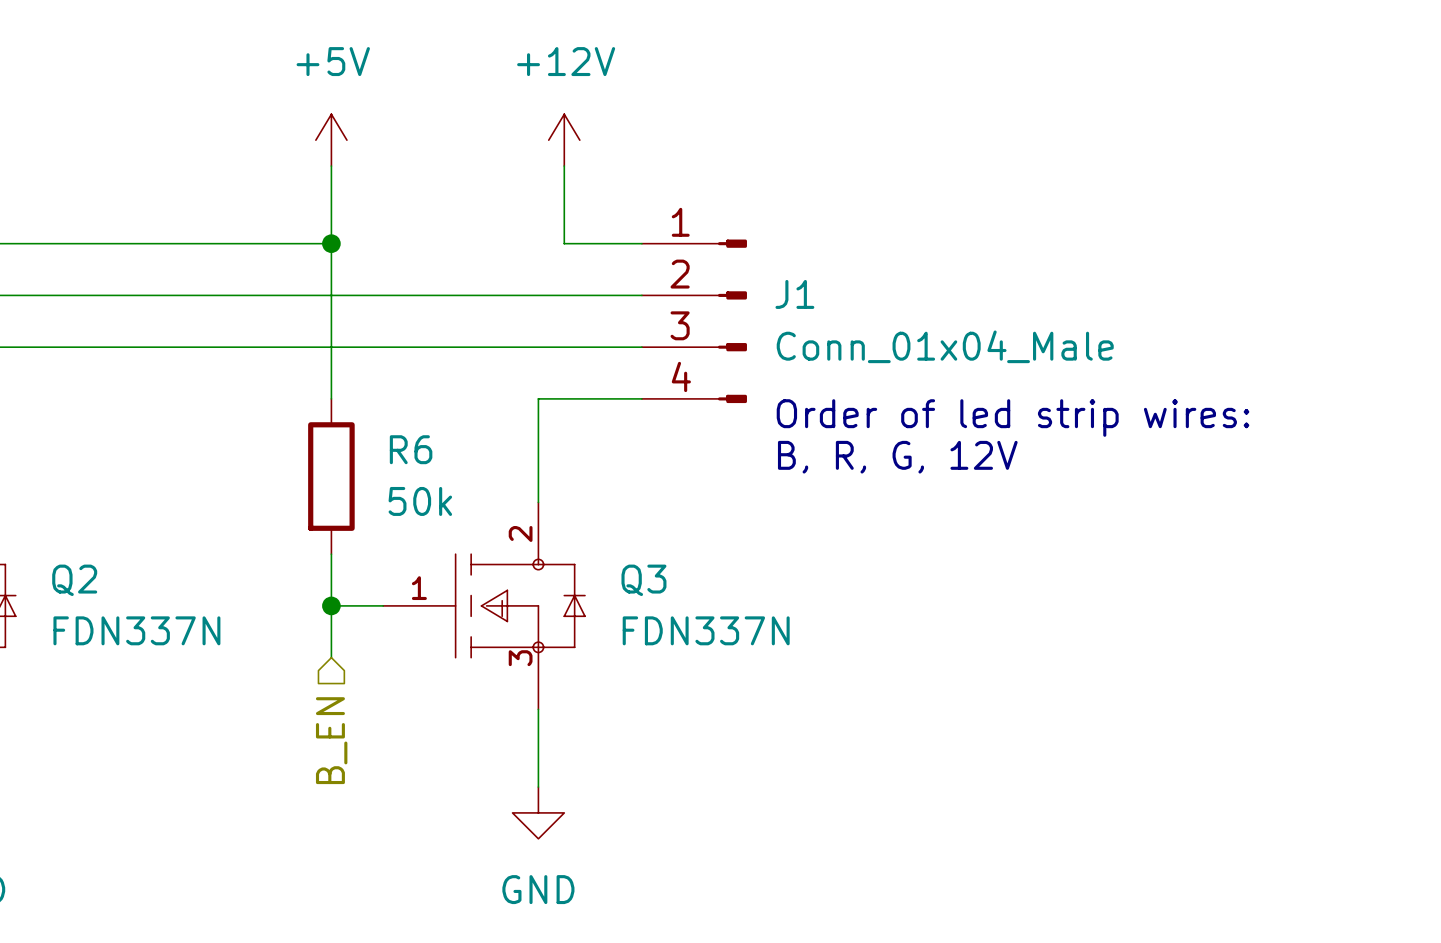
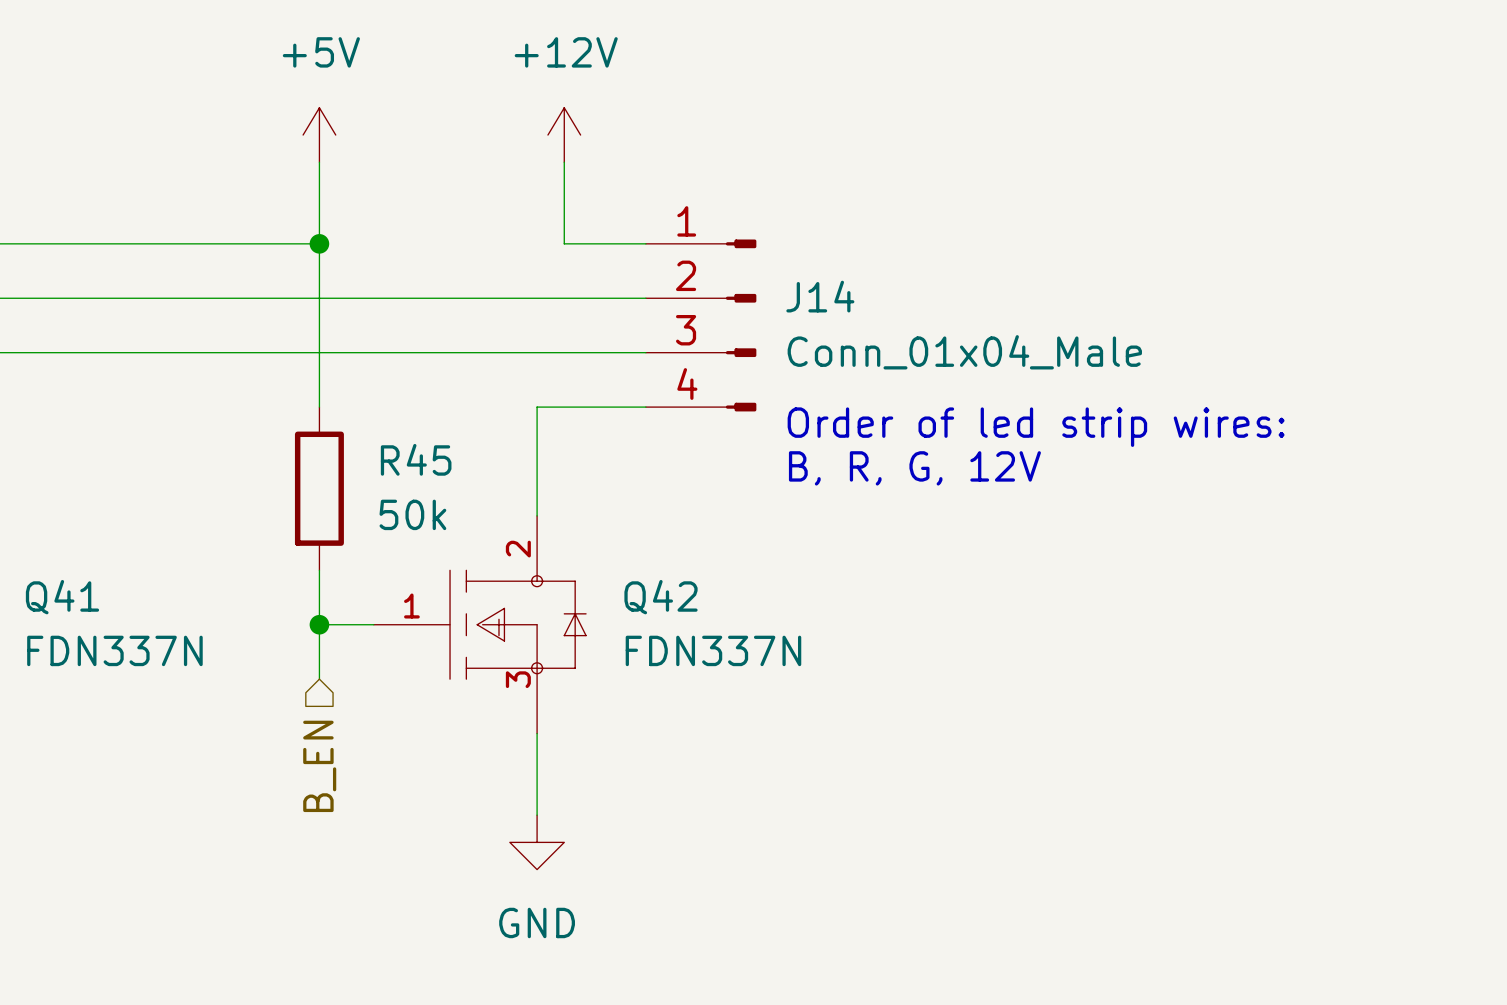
J1 name: J1 (794, 294) -> J14 (820, 296)
R6 name: R6 (411, 449) -> R45 (416, 459)
Q2 name: Q2 (74, 580) -> Q41 (62, 597)
Q3 name: Q3 (643, 580) -> Q42 (661, 597)

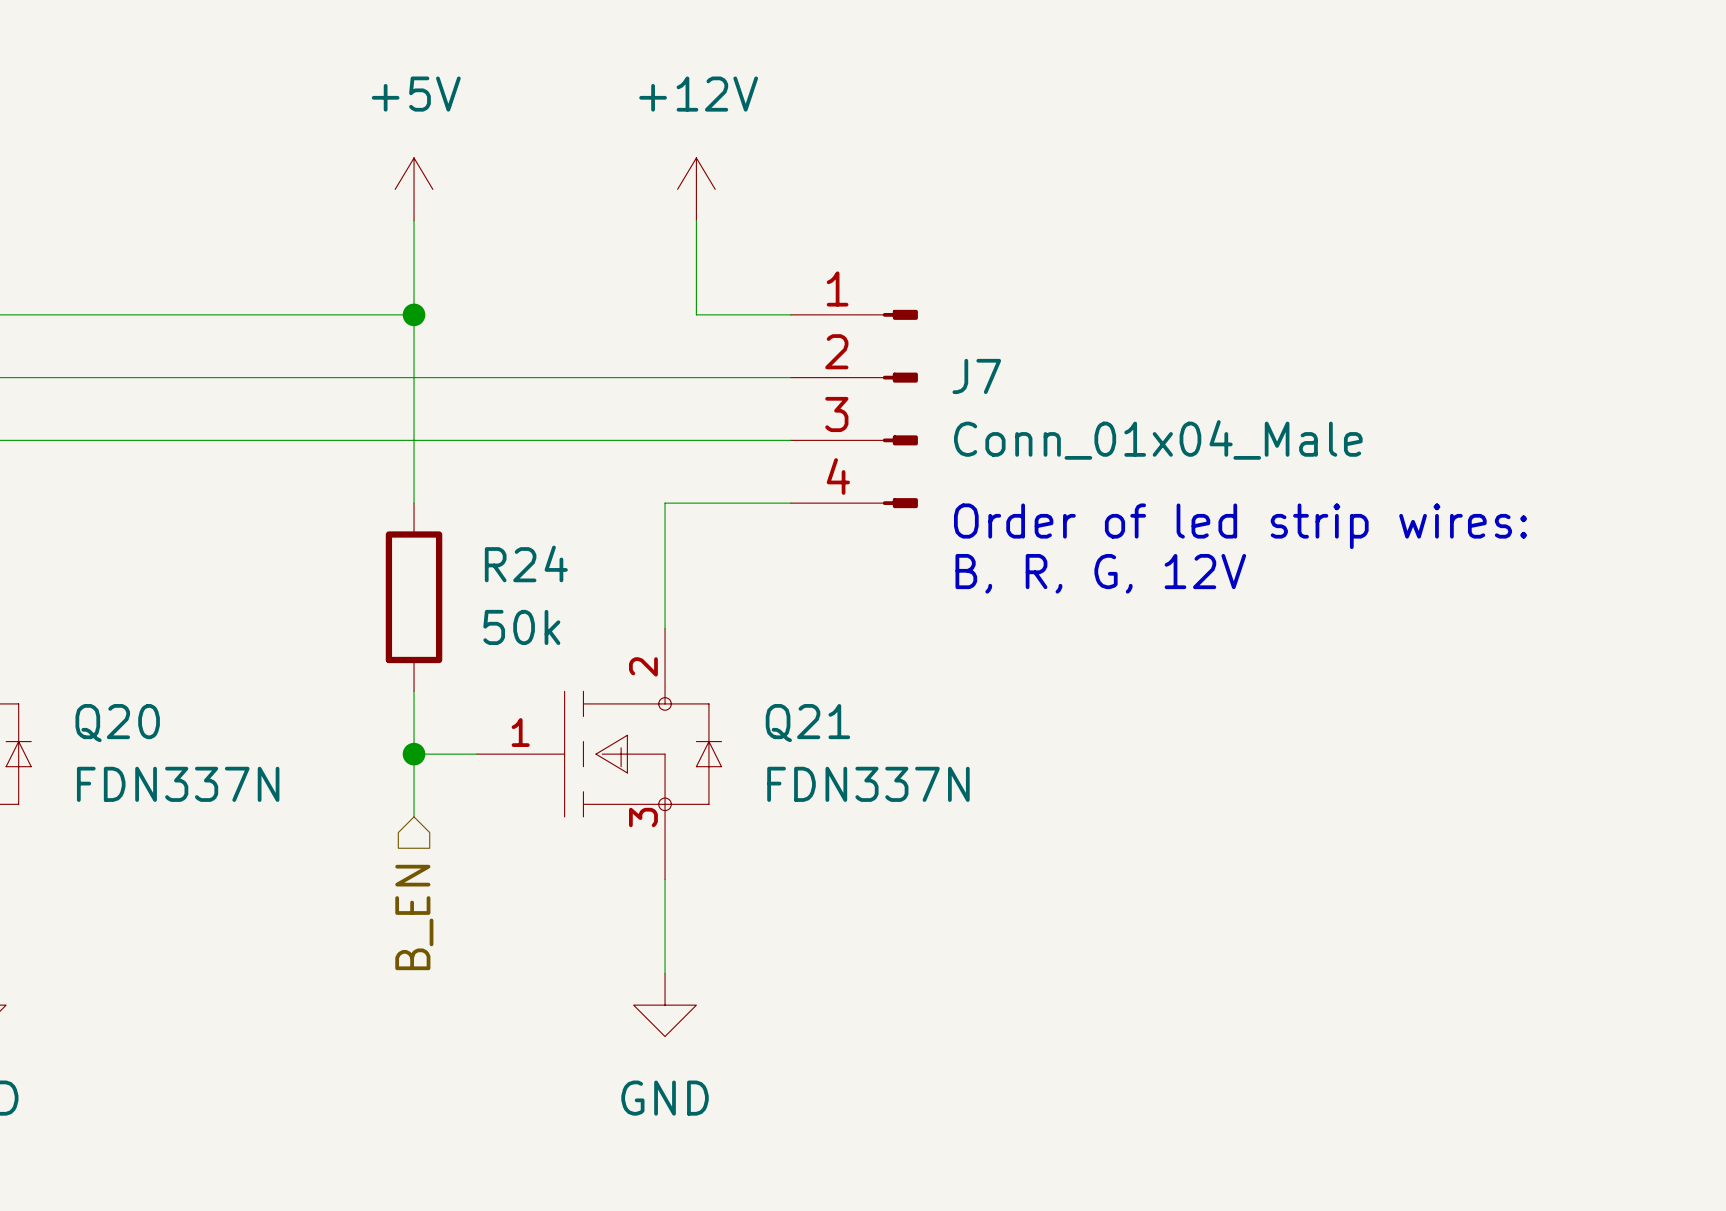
J14 name: J14 (820, 296) -> J7 (976, 376)
R45 name: R45 (416, 459) -> R24 (526, 563)
Q41 name: Q41 (62, 597) -> Q20 (117, 723)
Q42 name: Q42 (661, 597) -> Q21 (807, 723)

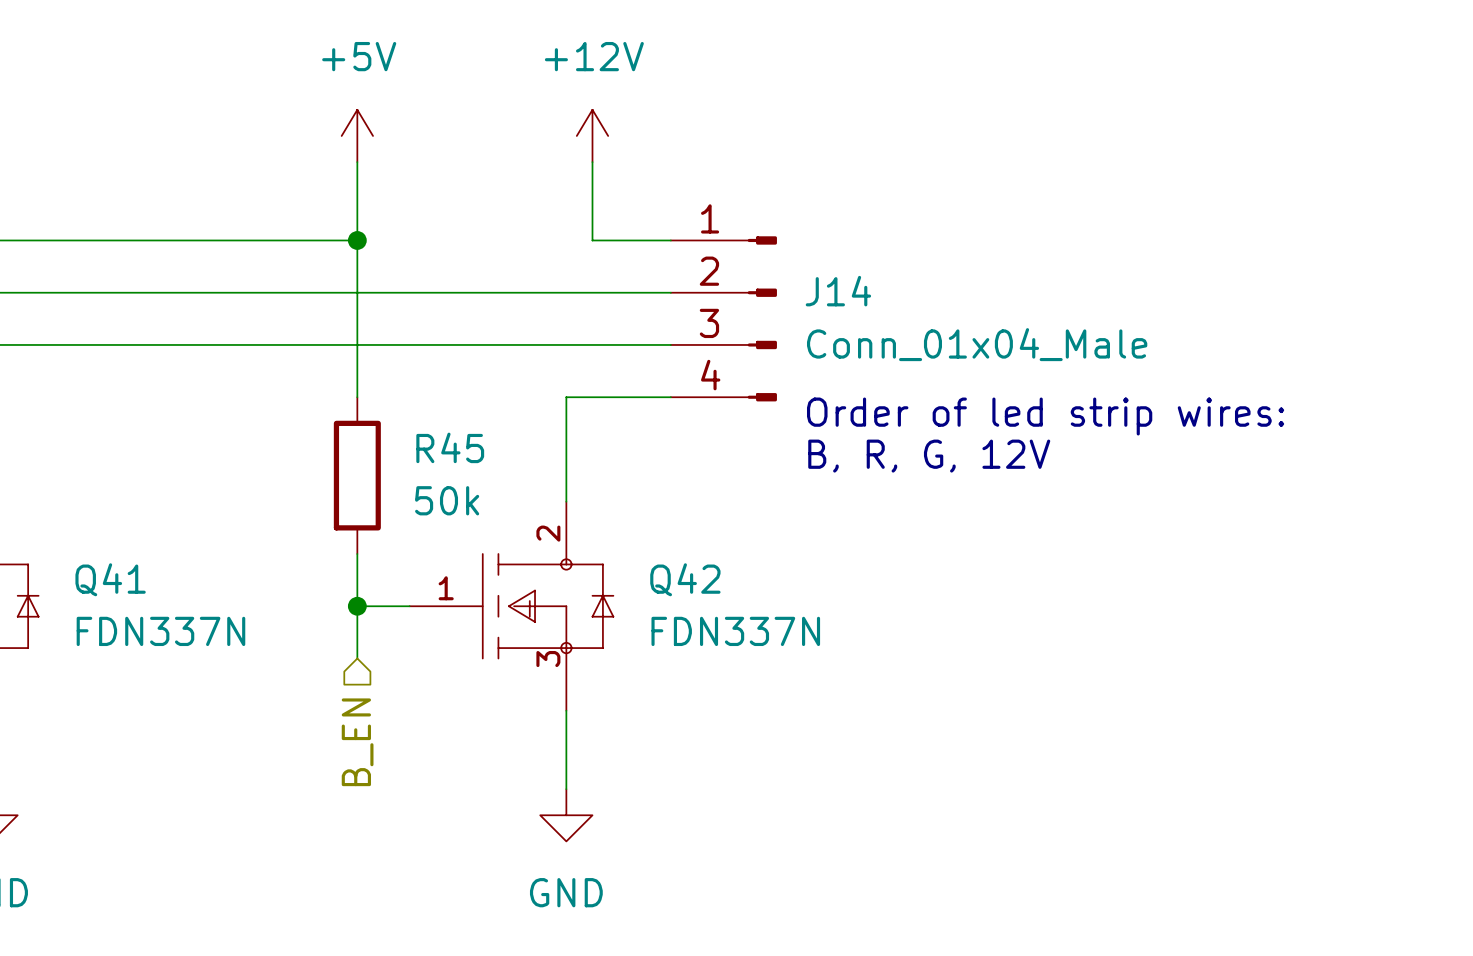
J7 name: J7 (976, 376) -> J14 (838, 291)
R24 name: R24 (526, 563) -> R45 (450, 447)
Q20 name: Q20 (117, 723) -> Q41 (110, 579)
Q21 name: Q21 (807, 723) -> Q42 (685, 579)

